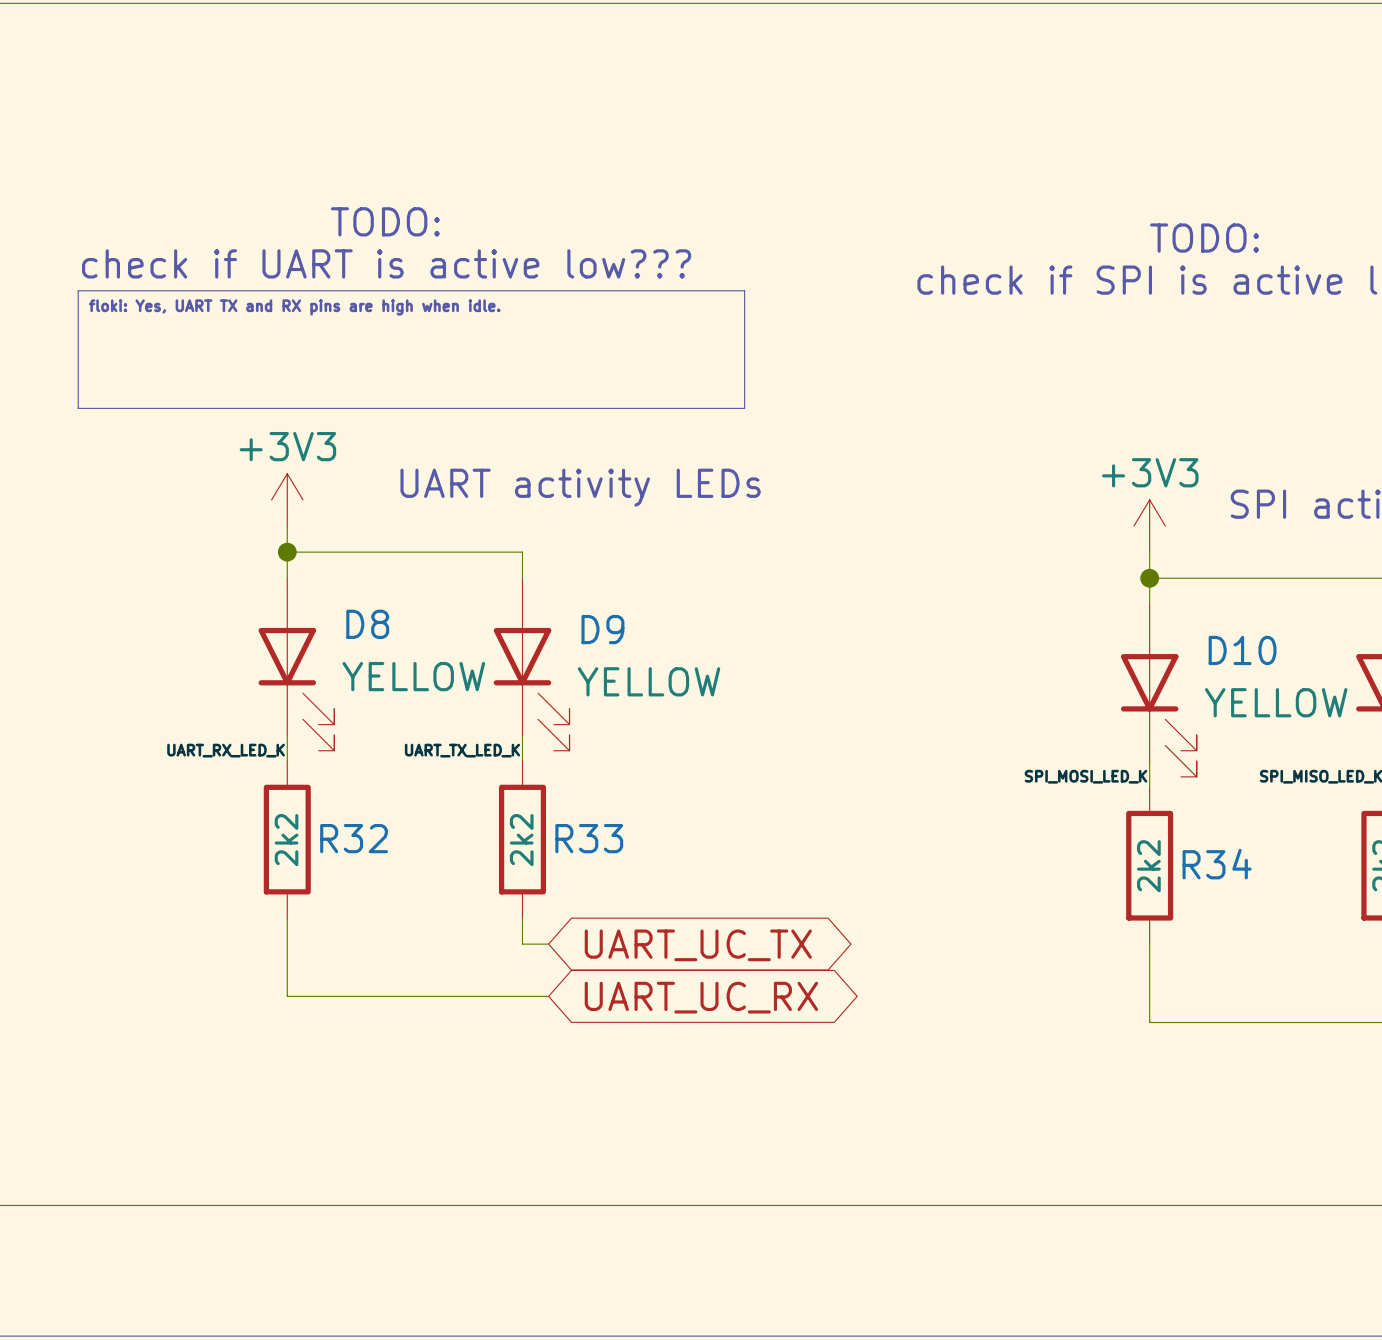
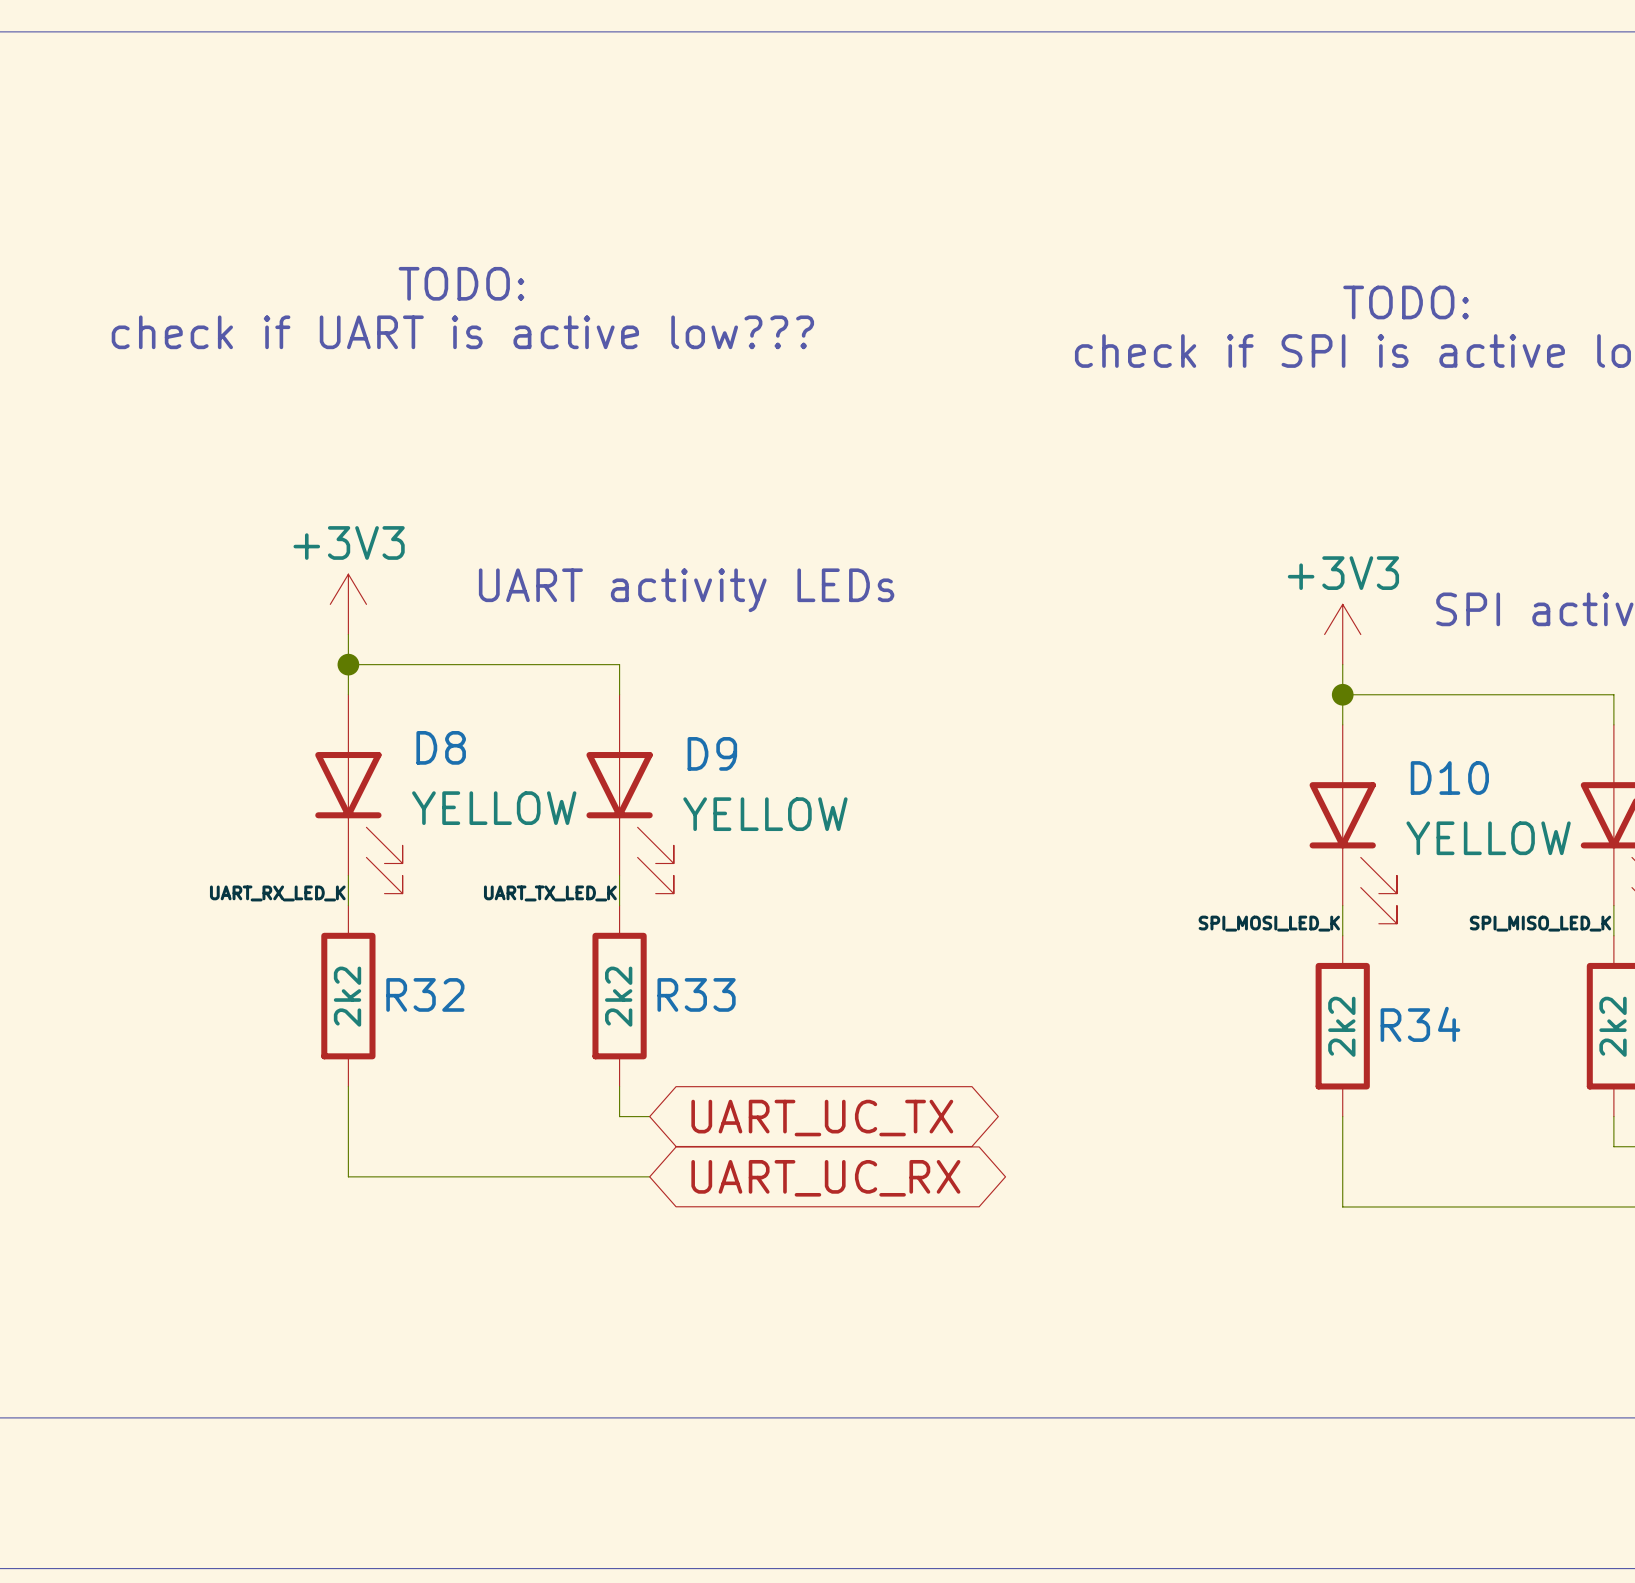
line: (78, 290) (744, 290) (744, 408) (78, 408) (78, 290) -> none
text: floki: Yes, UART TX and RX pins are high when idle. (294, 307) -> none

